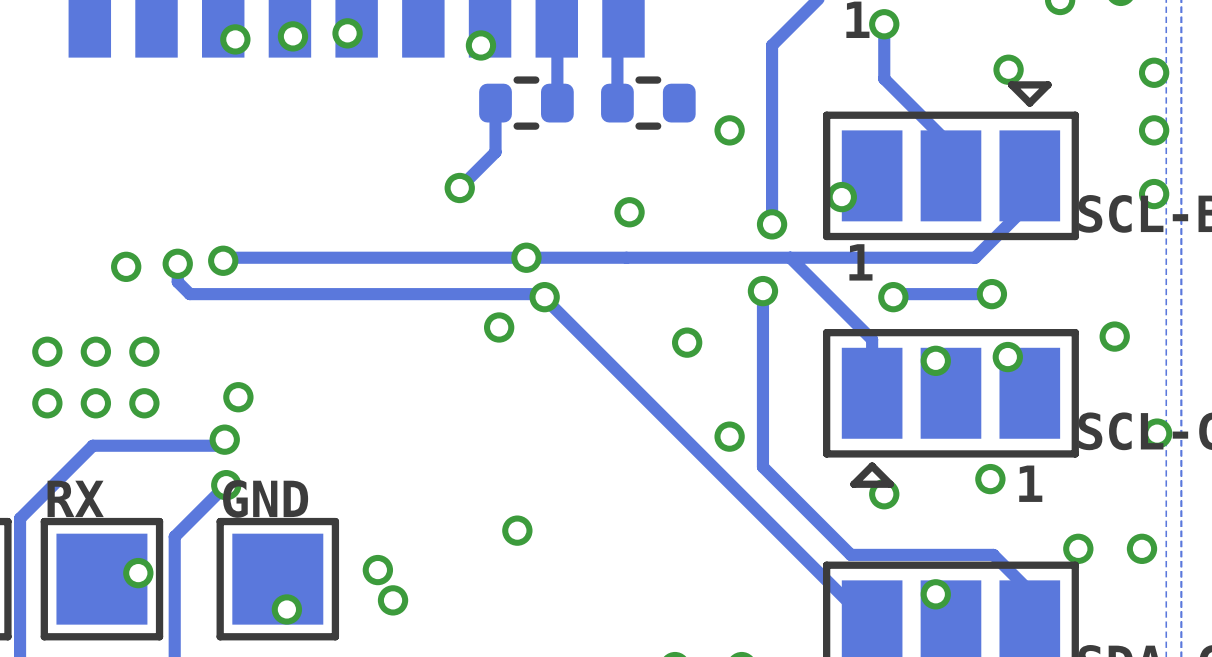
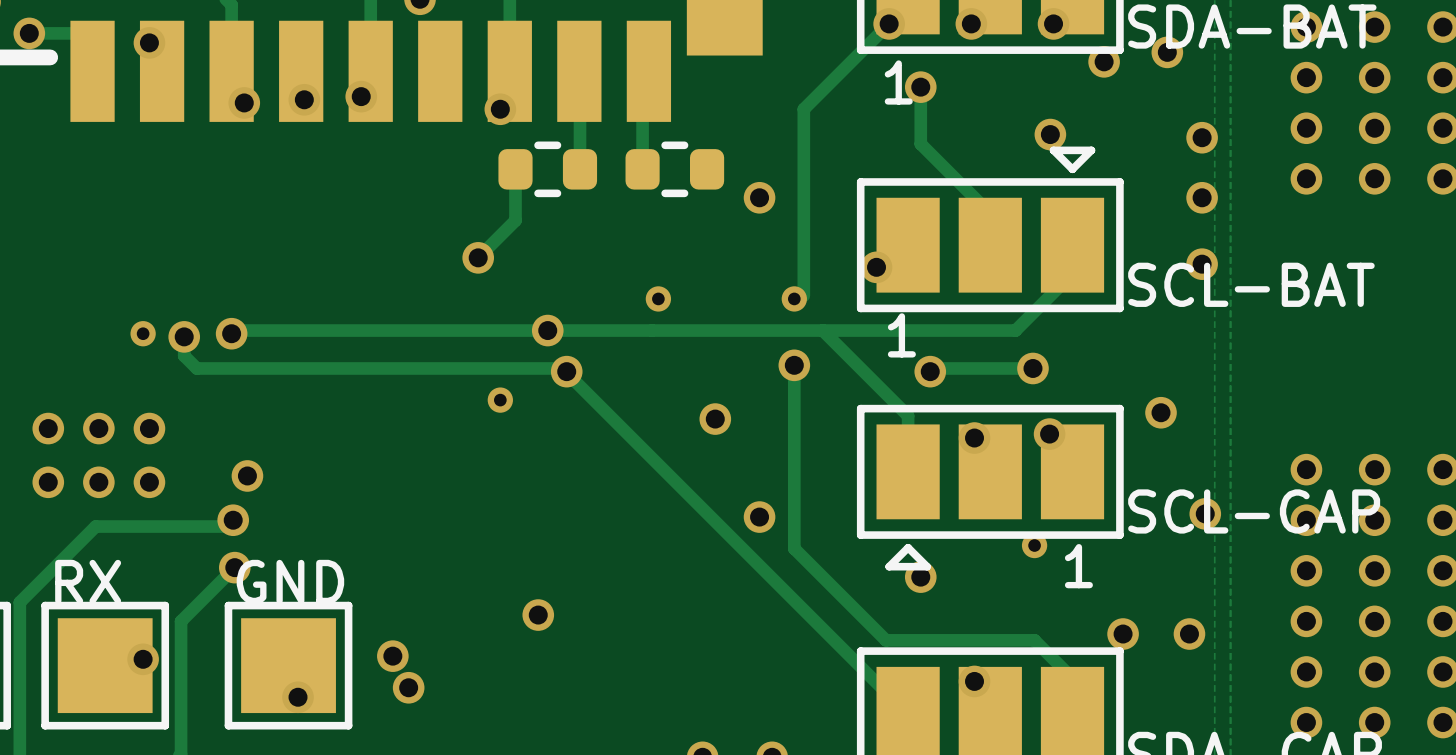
via size: [756, 209, 788, 240] -> [781, 286, 807, 312]
via position: (629, 212) -> (658, 298)
via position: (126, 266) -> (143, 333)
via position: (499, 327) -> (500, 400)
via position: (990, 479) -> (1034, 545)

